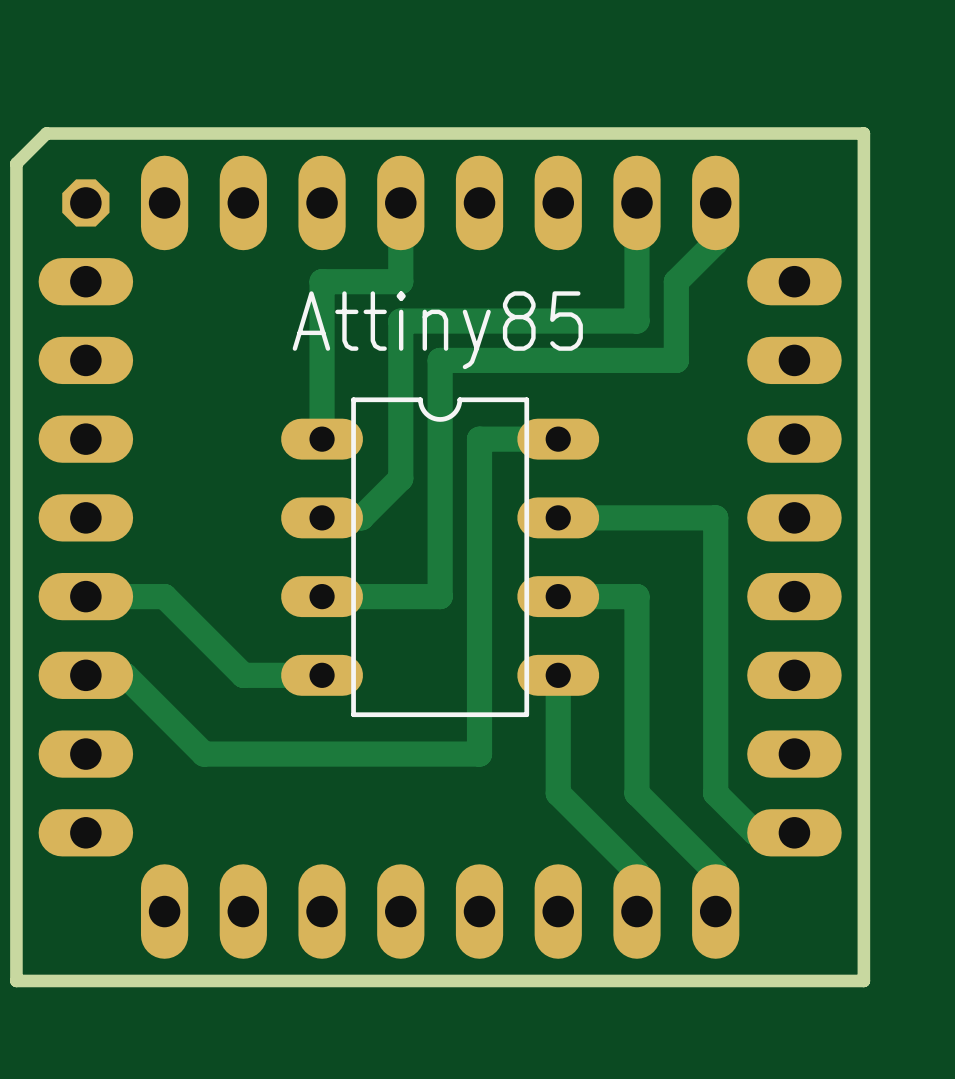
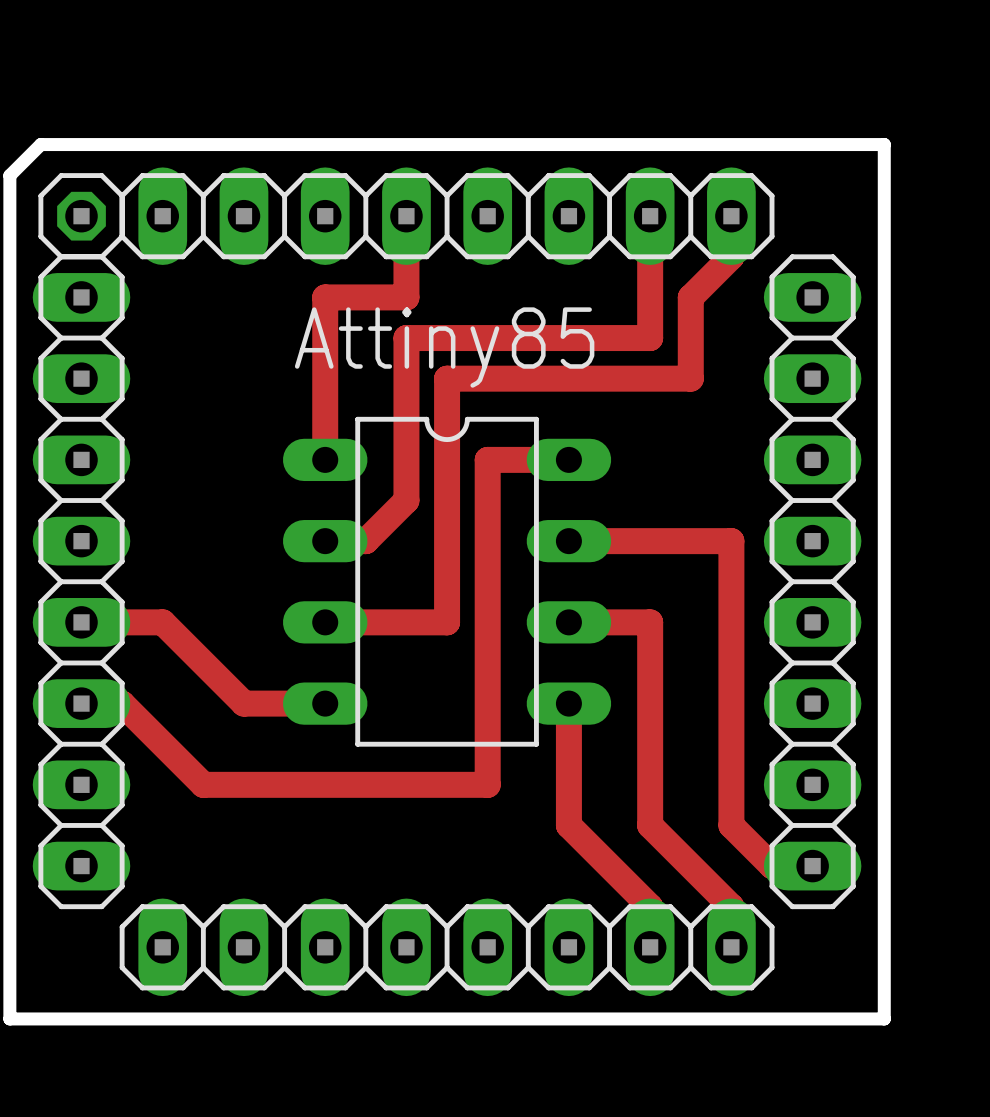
part side: bottom (85, 202) -> top (81, 216)
part side: bottom (440, 202) -> top (447, 216)
part side: bottom (85, 557) -> top (81, 581)
part side: bottom (794, 557) -> top (812, 581)
part side: bottom (440, 911) -> top (447, 947)

